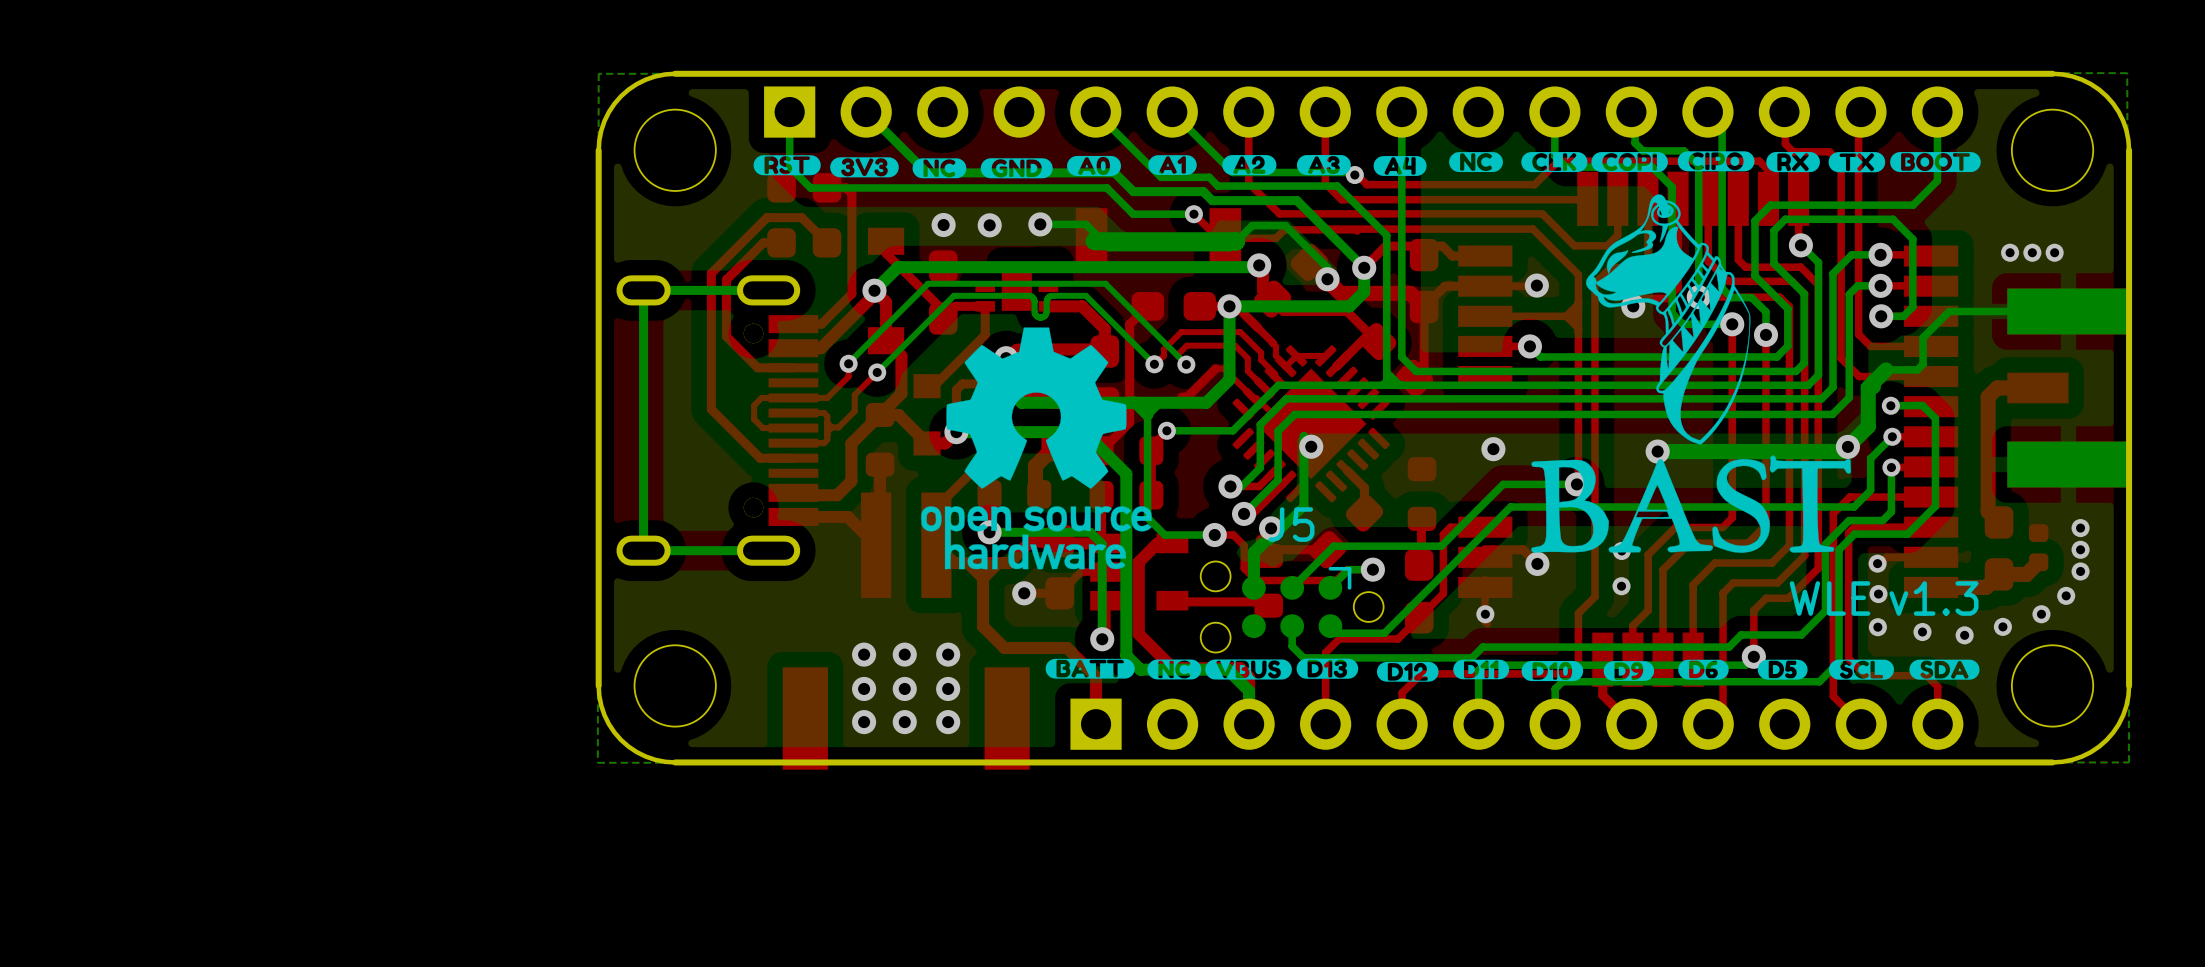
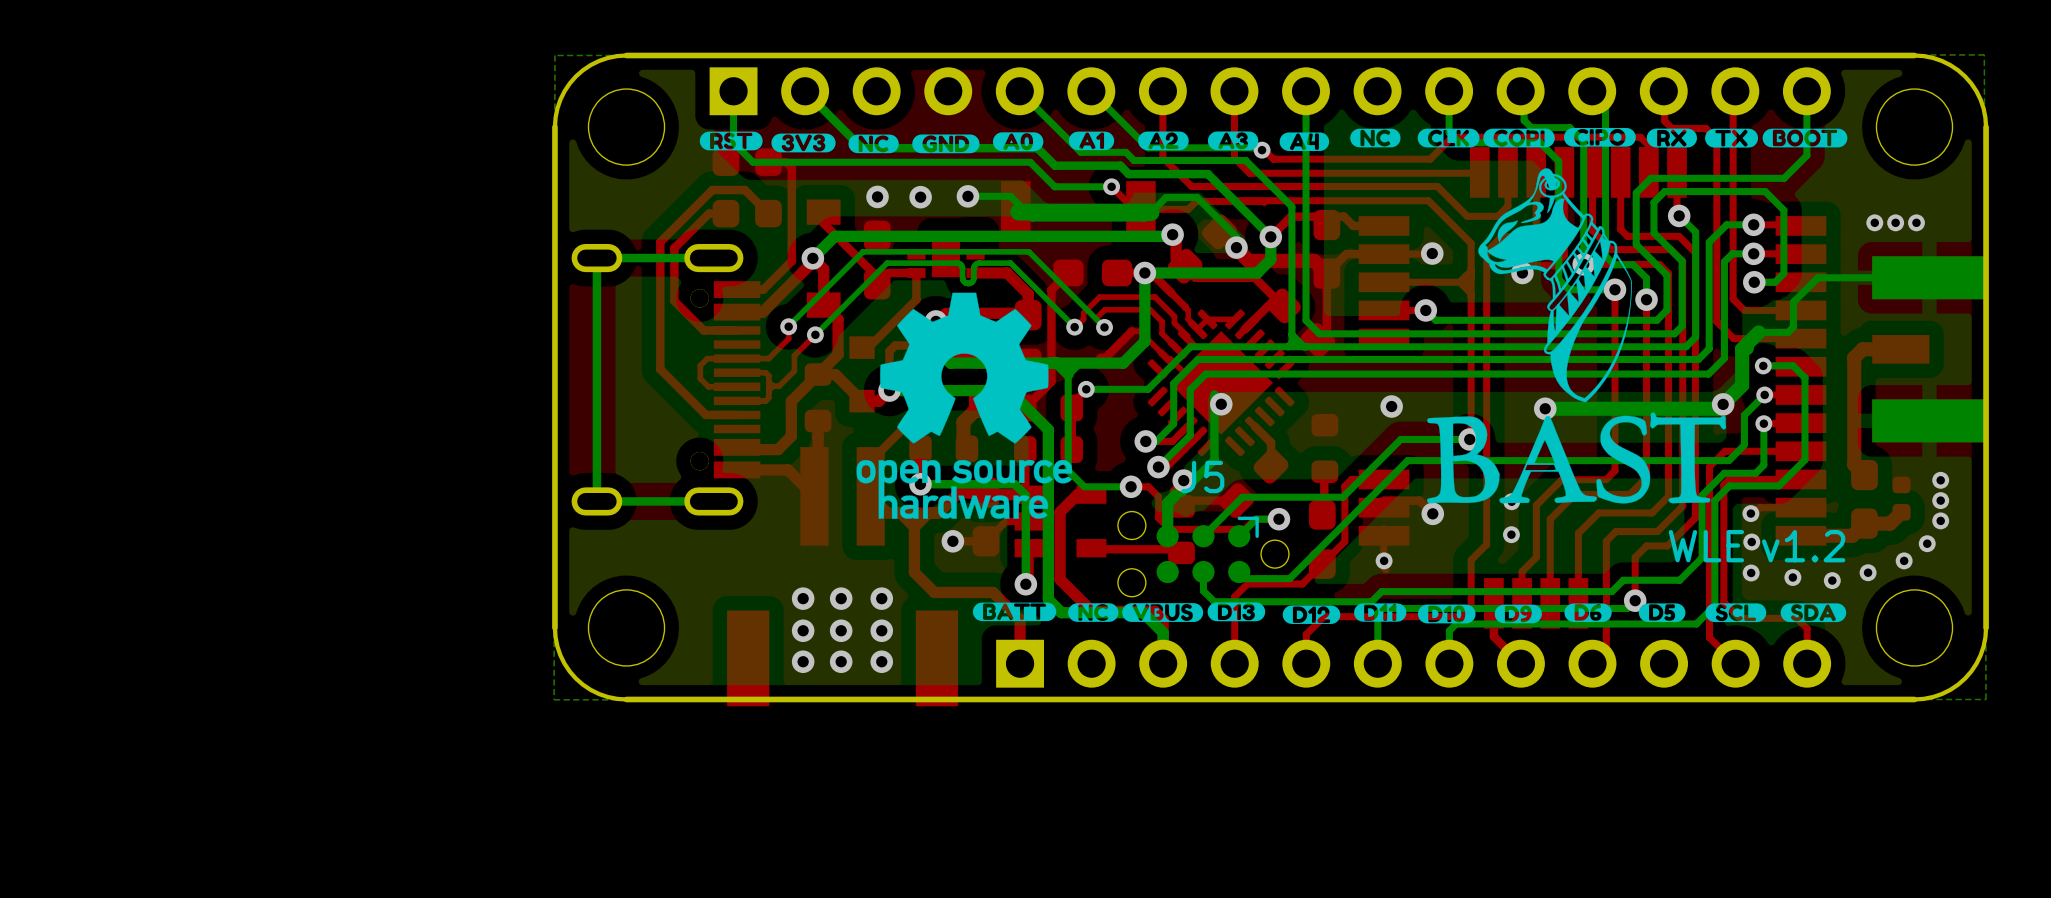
text: v1.3 (1933, 598) -> v1.2 (1803, 546)

